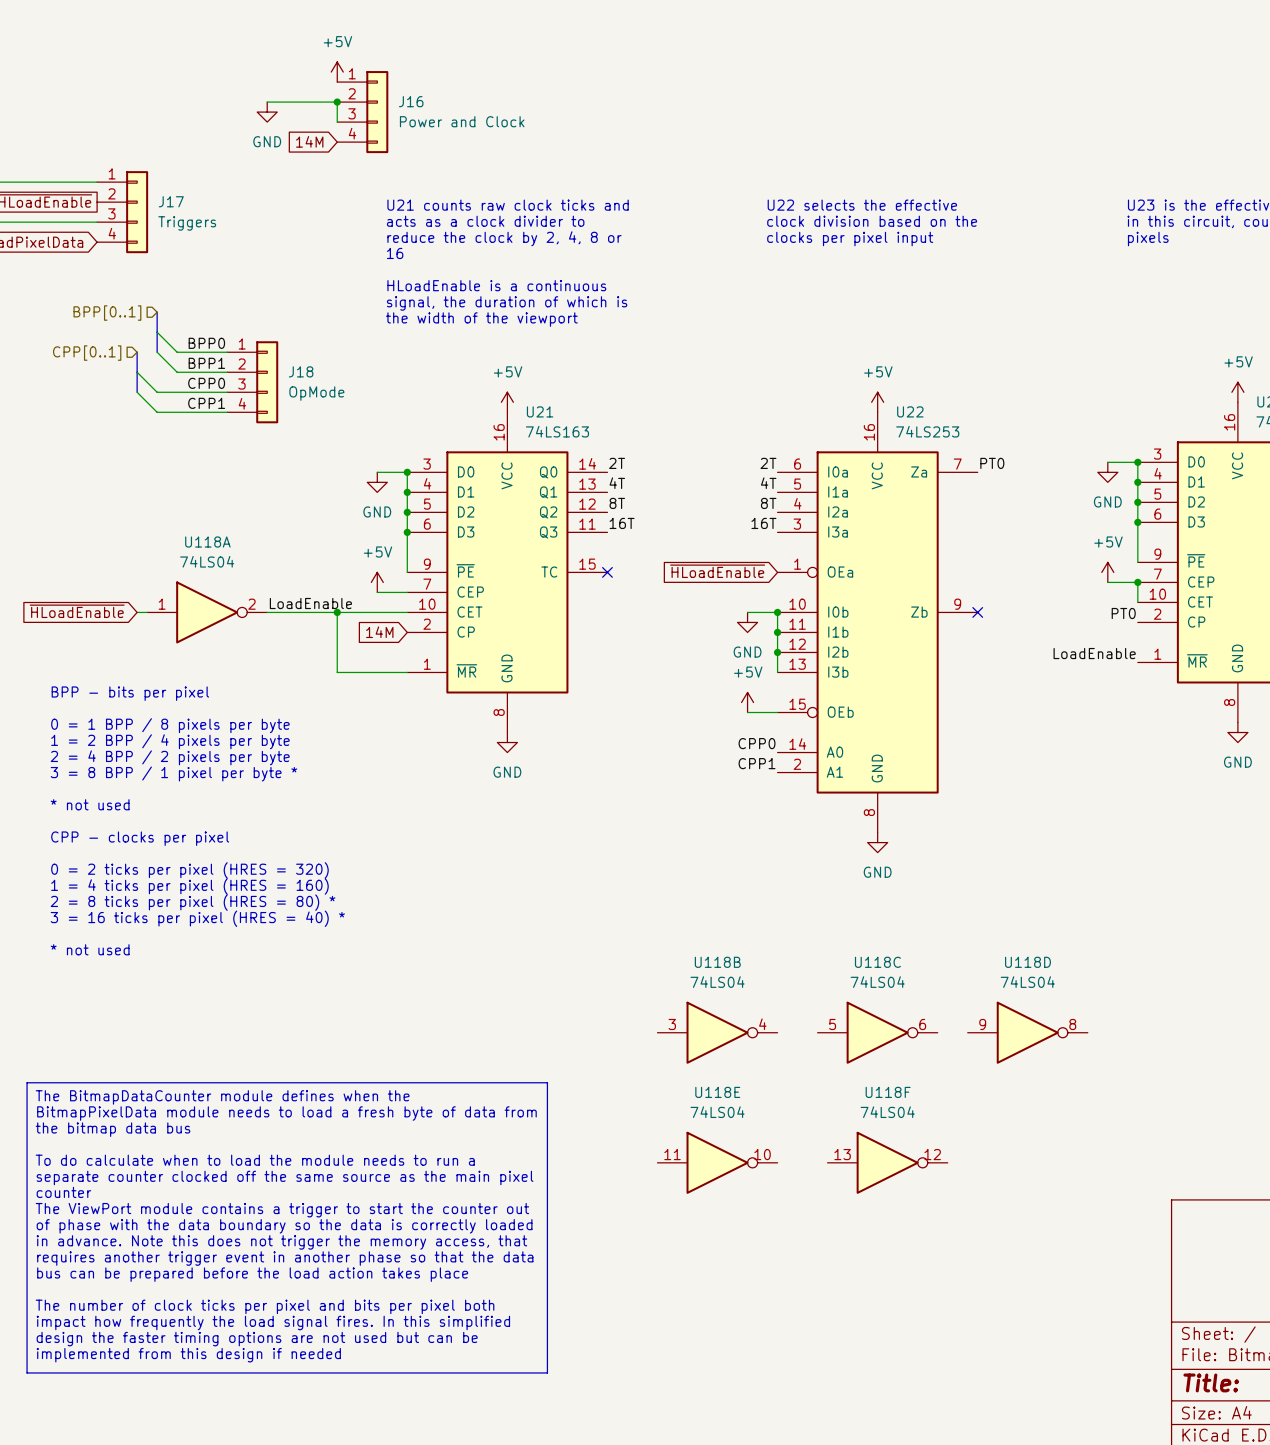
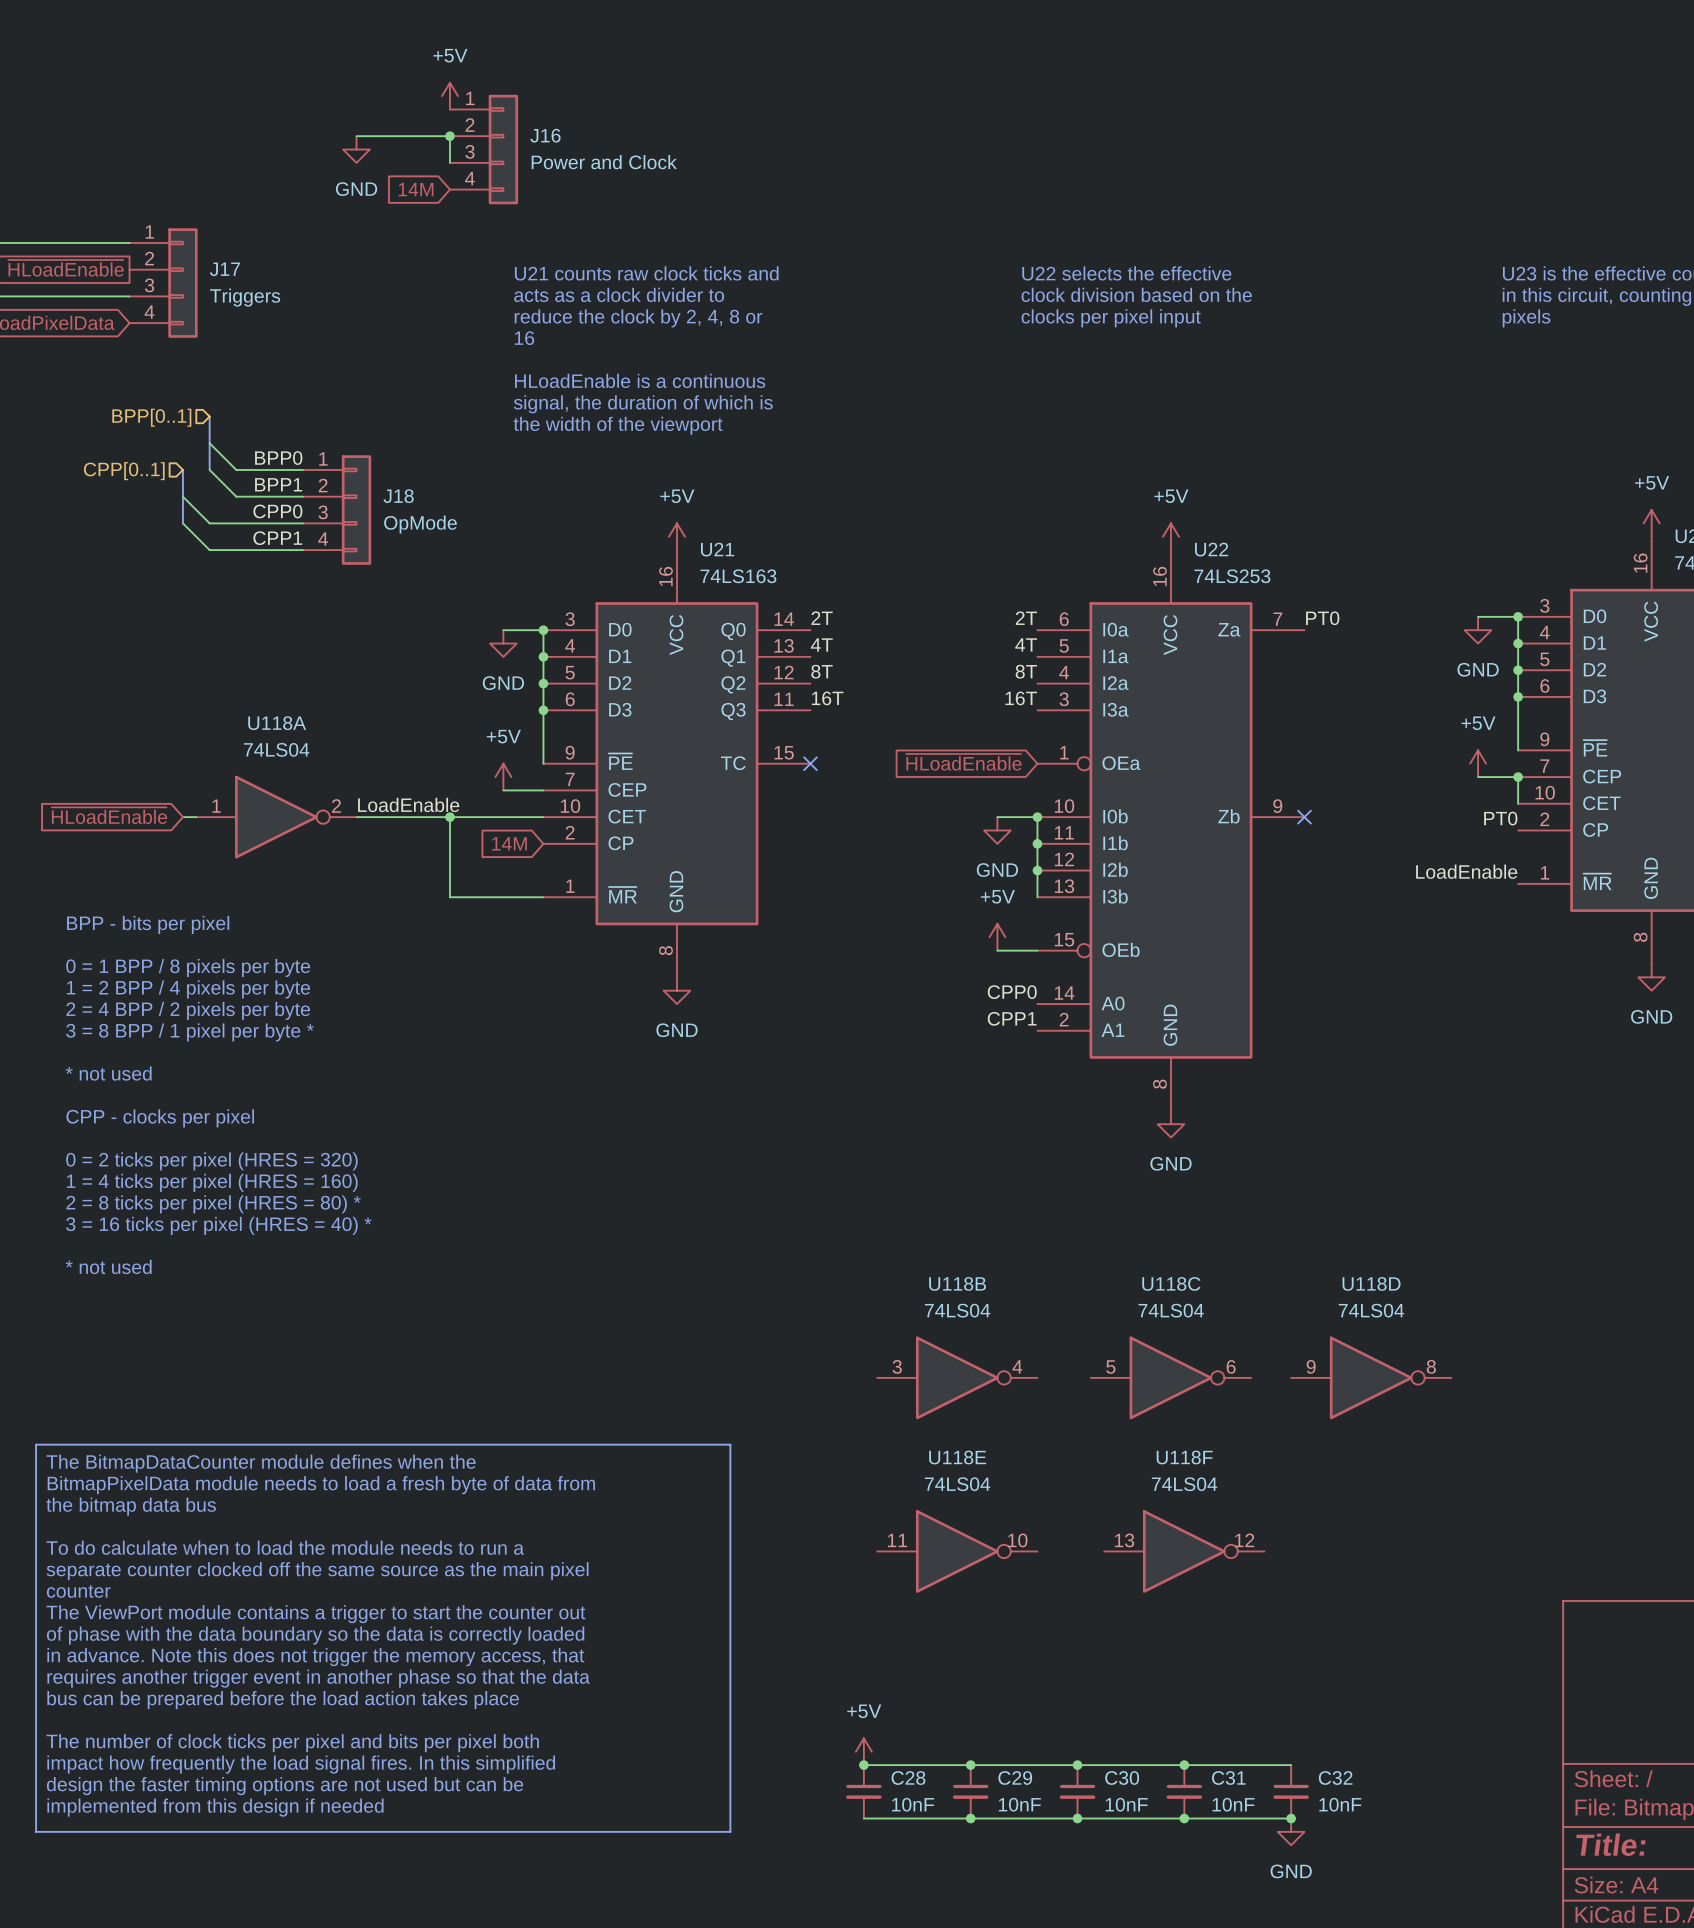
power symbol: none -> +5V (863, 1751)
wire: none -> (863, 1765) (1291, 1765)
junction: none -> (863, 1765)
junction: none -> (970, 1765)
junction: none -> (1077, 1765)
junction: none -> (1184, 1765)
C28: none -> 10nF (863, 1791)
C29: none -> 10nF (970, 1791)
C30: none -> 10nF (1077, 1791)
C31: none -> 10nF (1184, 1791)
C32: none -> 10nF (1291, 1791)
wire: none -> (863, 1818) (1291, 1818)
junction: none -> (970, 1818)
junction: none -> (1077, 1818)
junction: none -> (1184, 1818)
junction: none -> (1291, 1818)
power symbol: none -> GND (1291, 1831)

